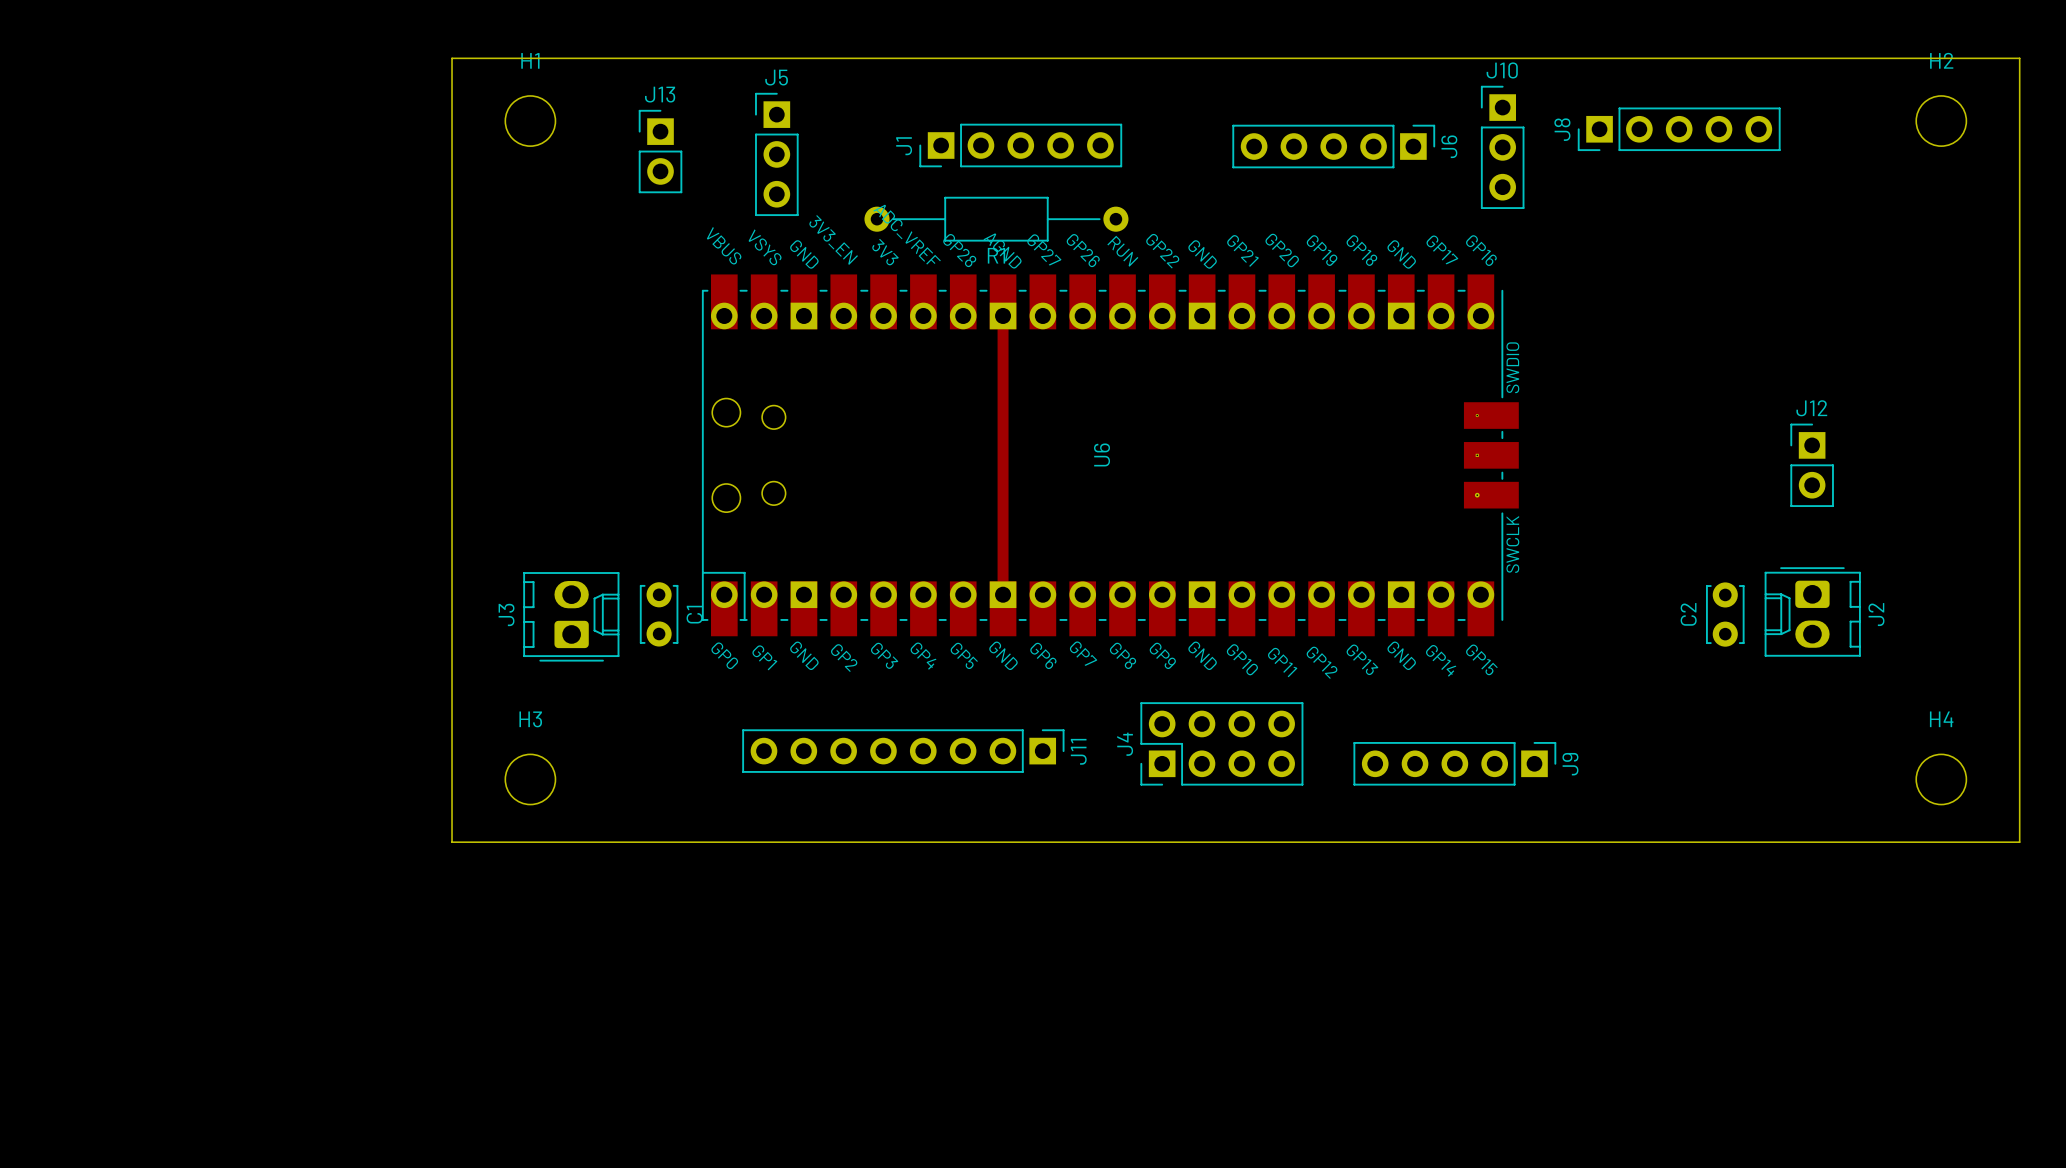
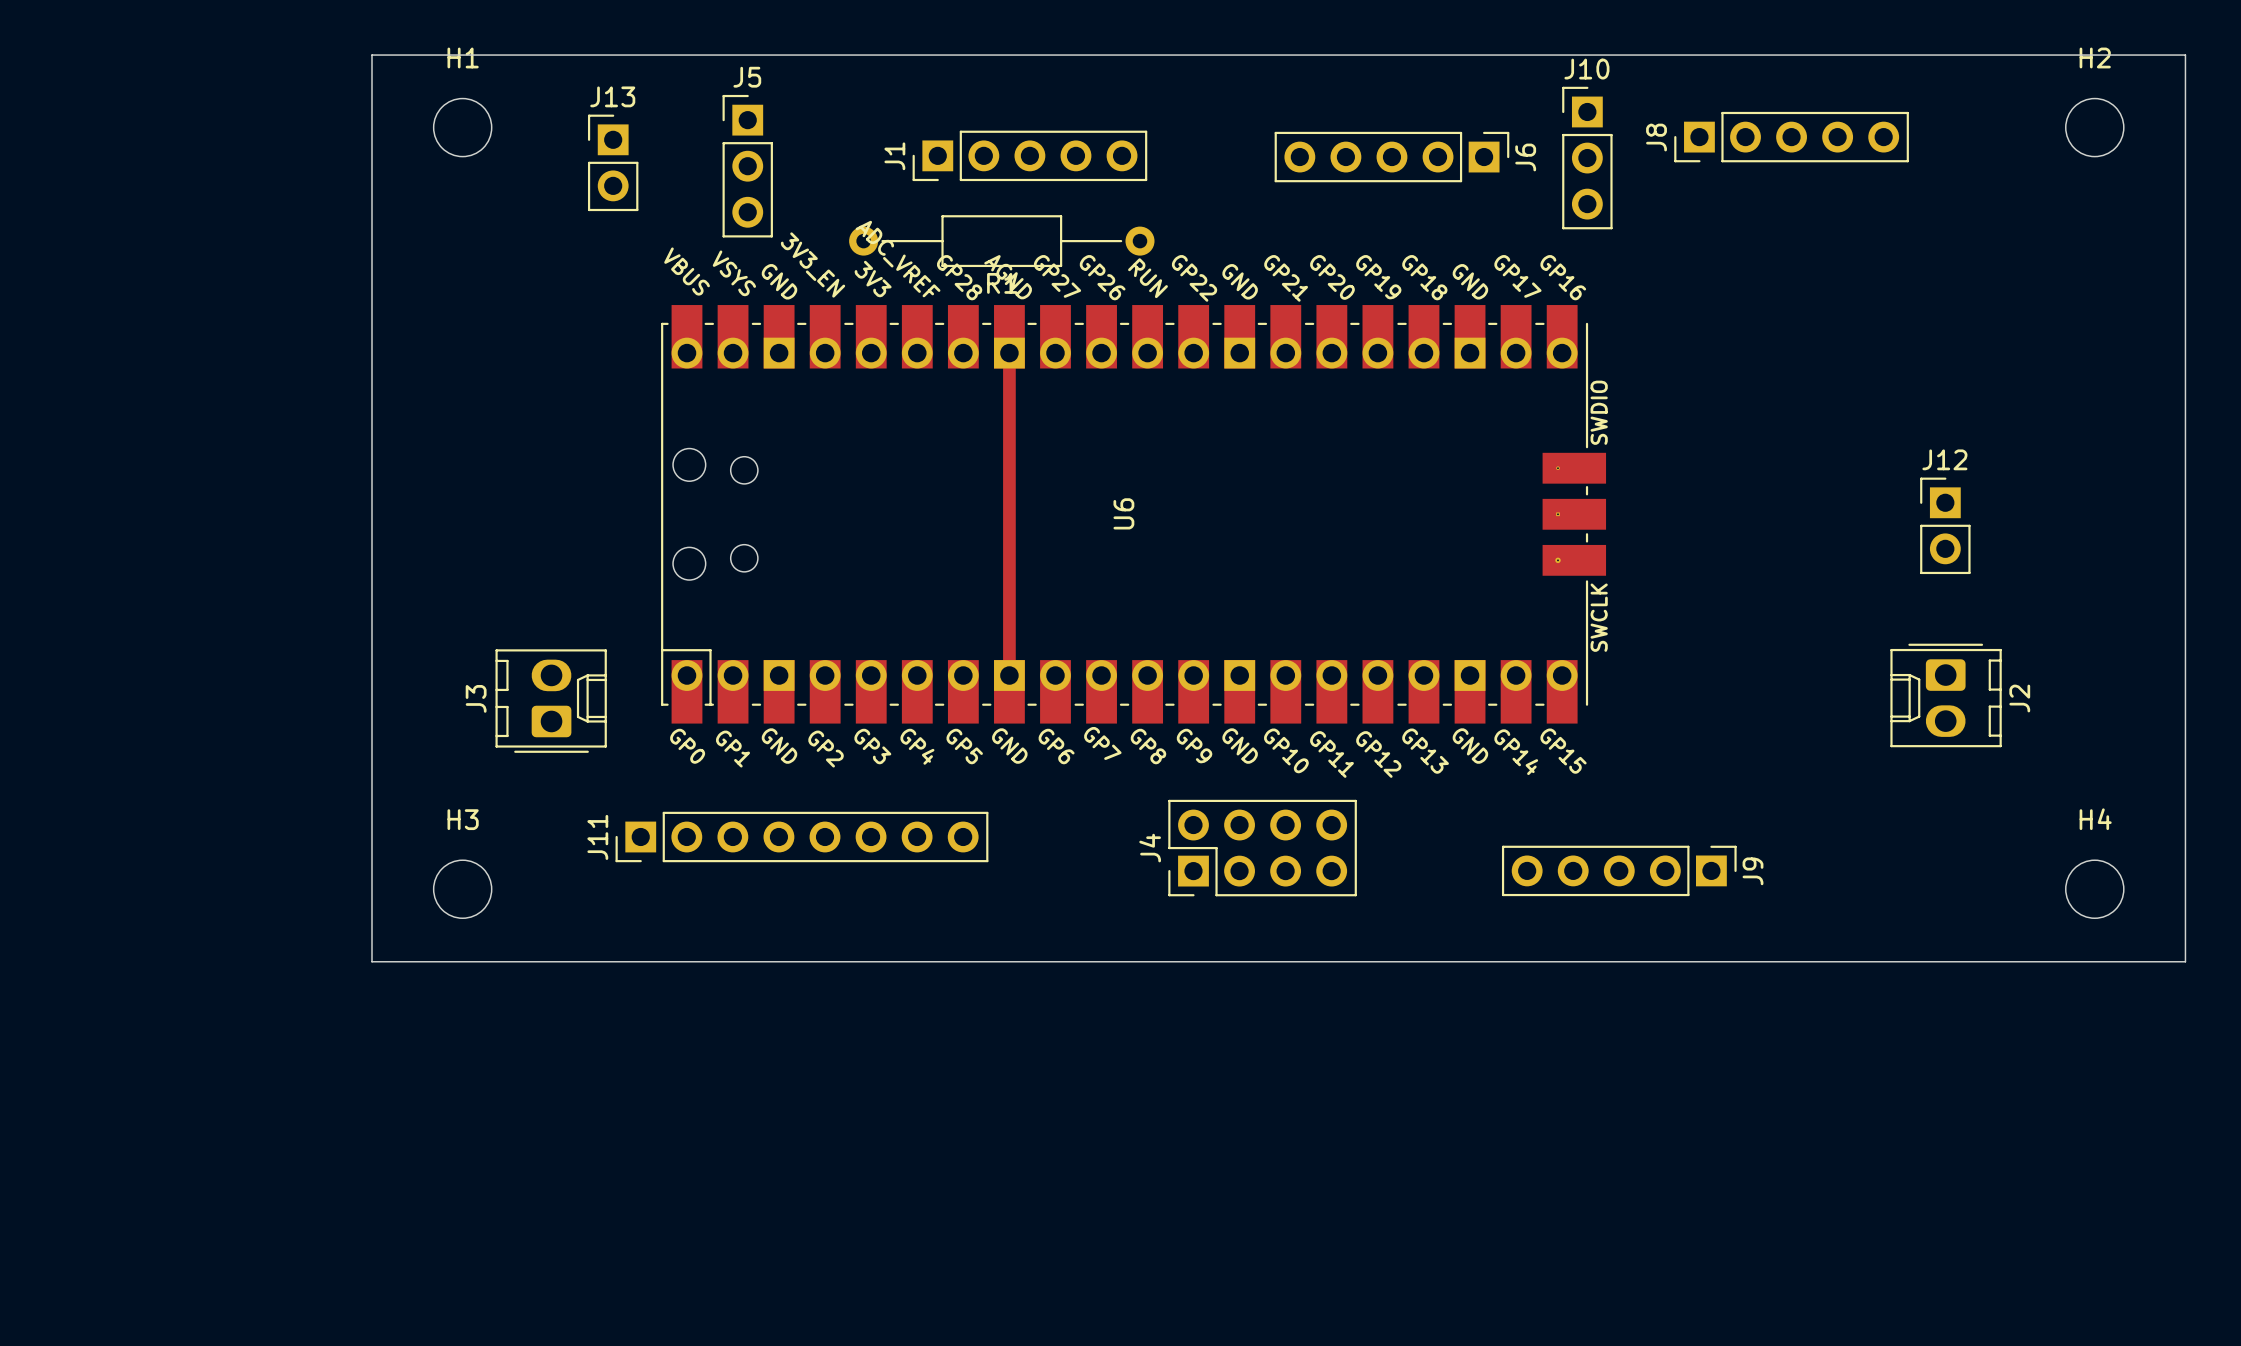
C1: (659, 614) -> none
C2: (1725, 614) -> none
J3 position: (571, 616) -> (551, 701)
J11 rotation: 0° (903, 751) -> 180° (801, 837)
J9 position: (1454, 763) -> (1619, 870)

